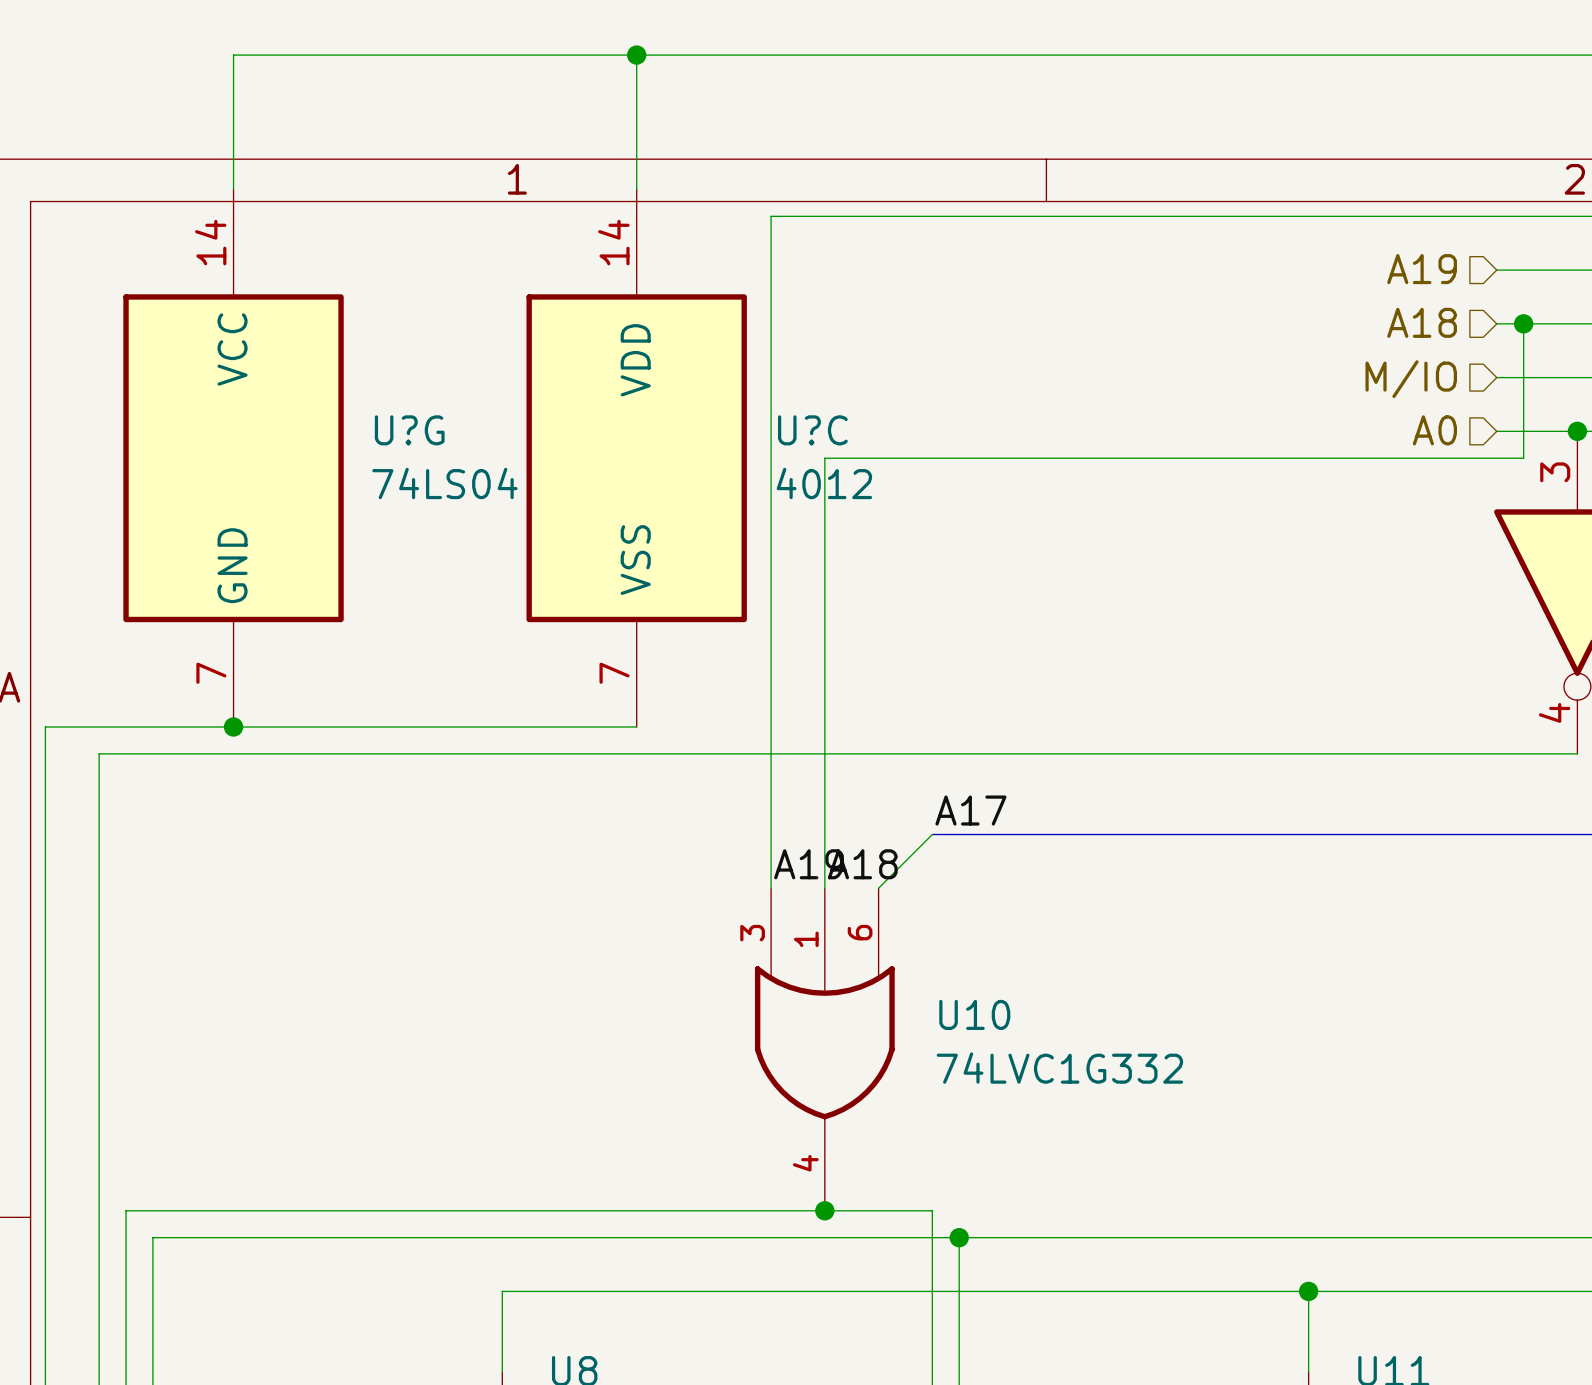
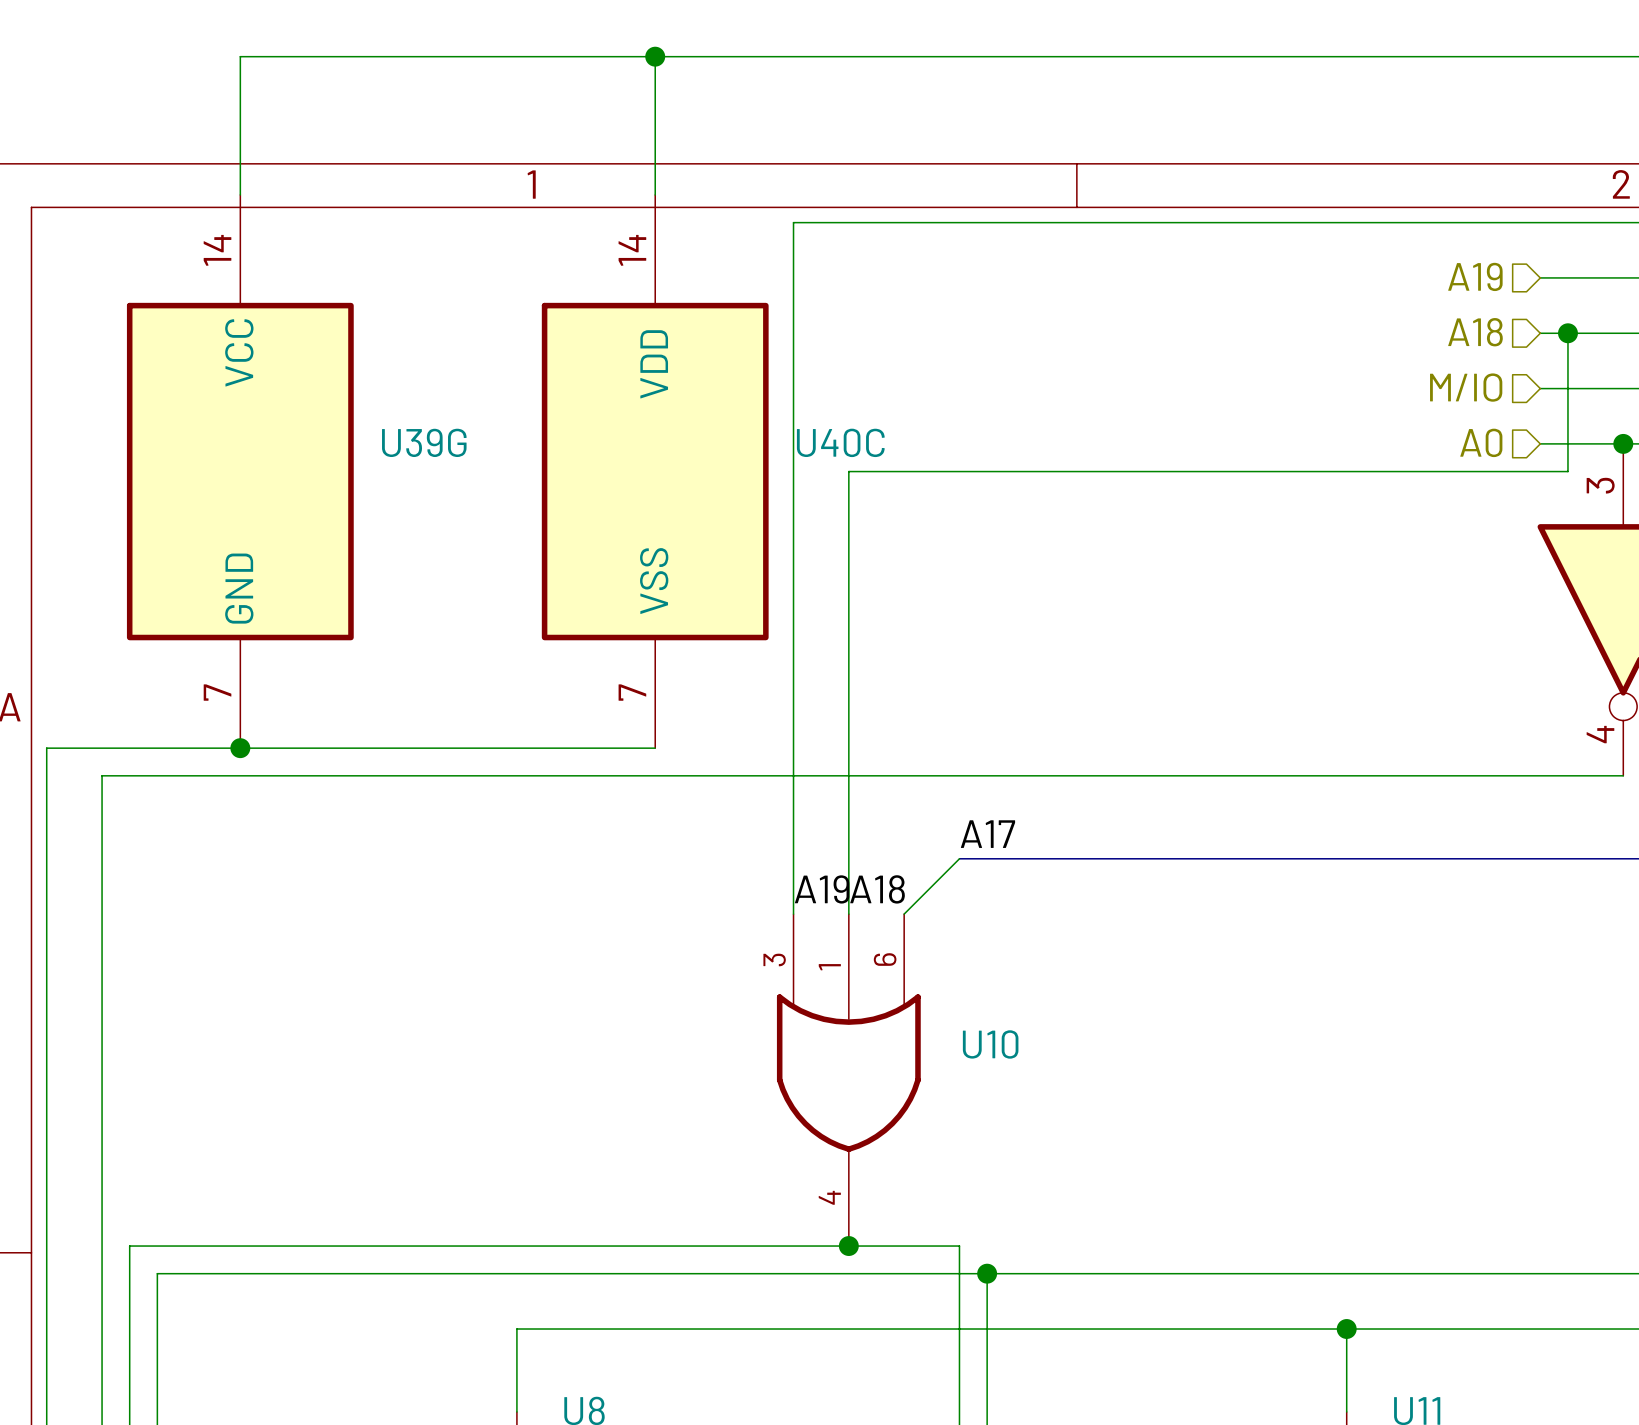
U?G name: U?G (409, 430) -> U39G (424, 442)
U?C name: U?C (812, 430) -> U40C (840, 442)
U?G value: 74LS04 (444, 483) -> none
U?C value: 4012 (824, 483) -> none
U10 value: 74LVC1G332 (1059, 1068) -> none

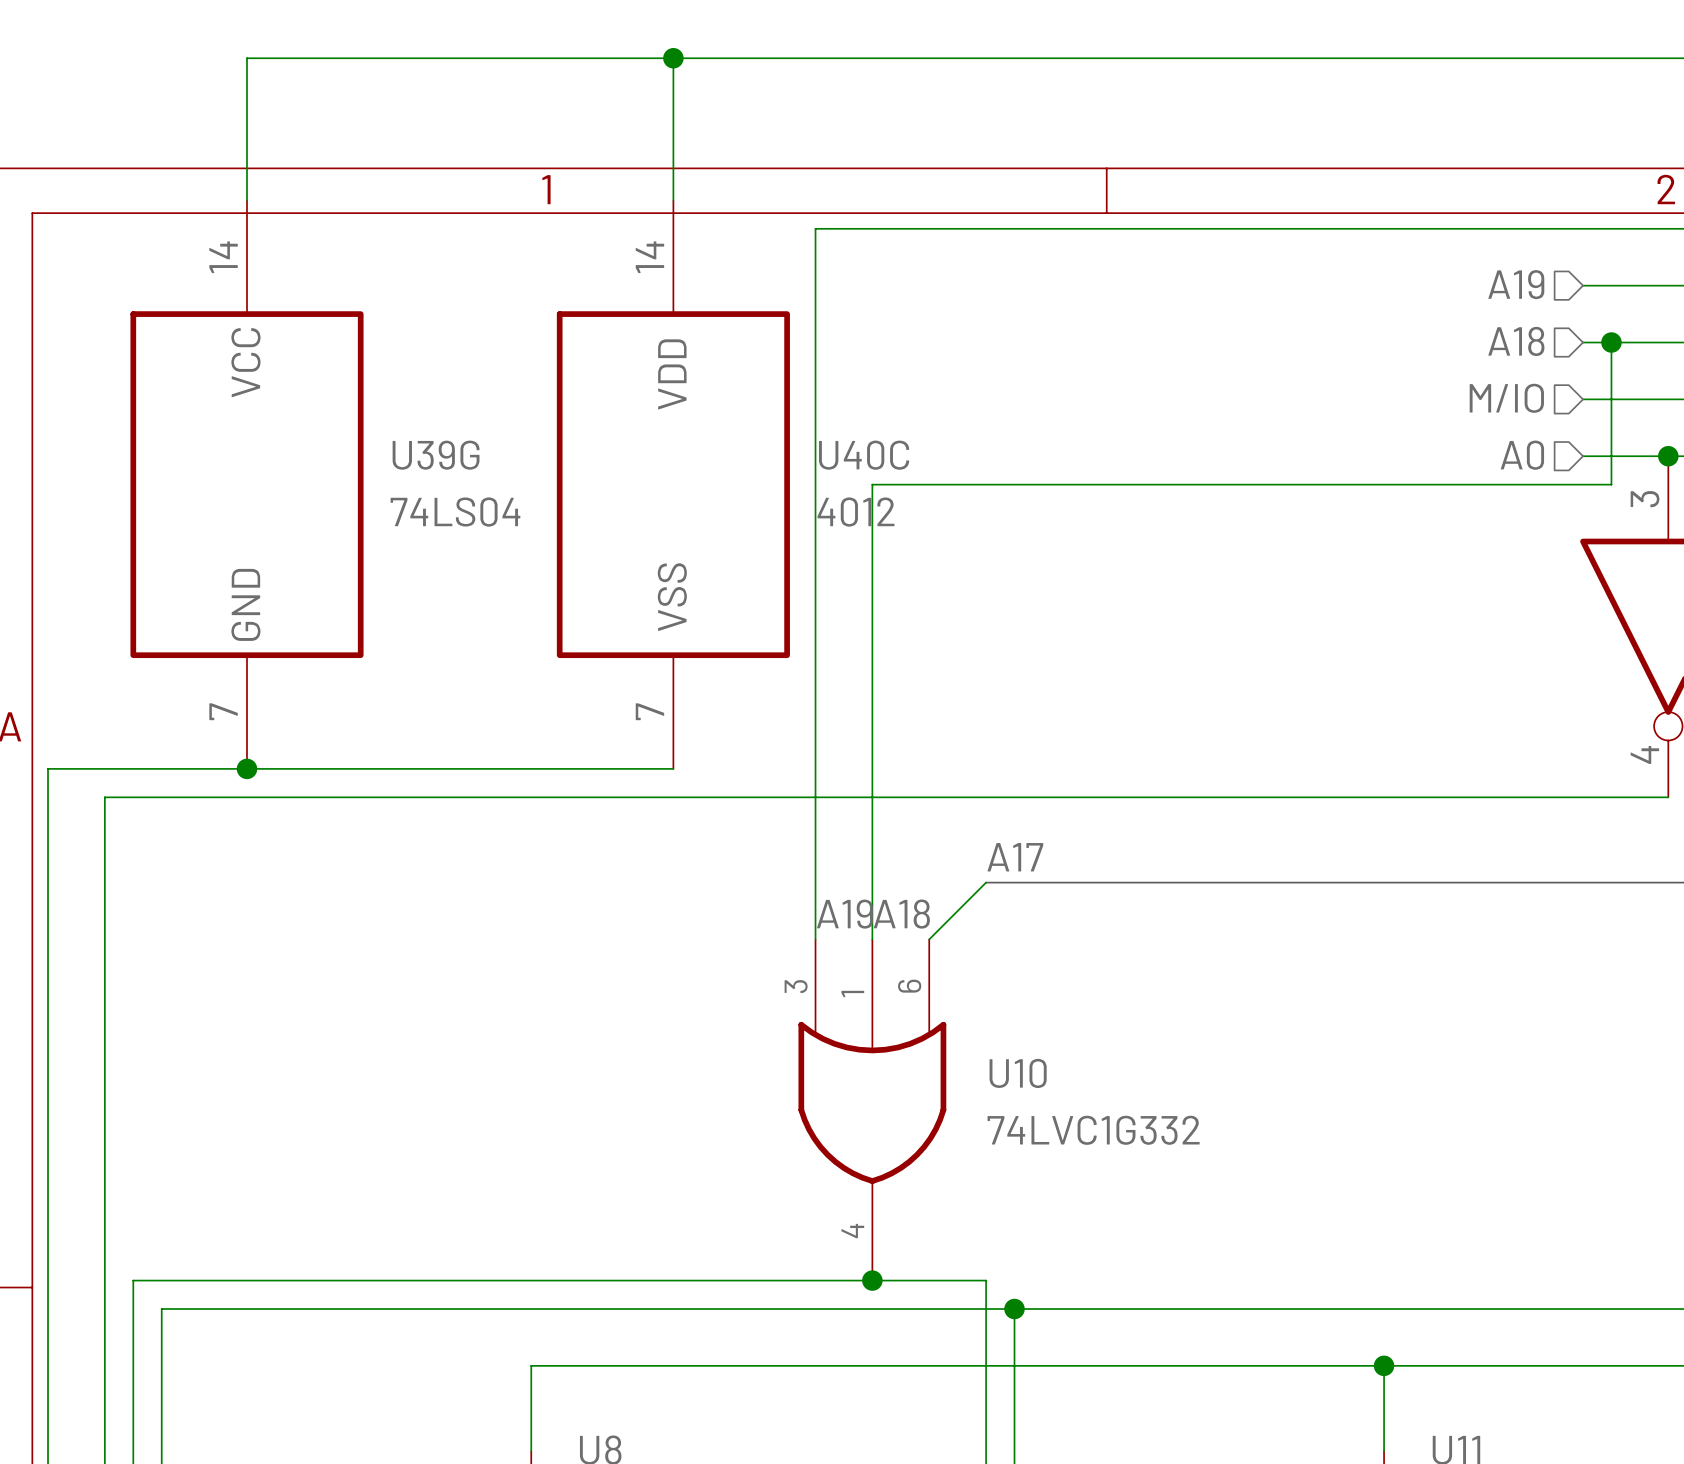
U39G value: none -> 74LS04 (455, 512)
U40C value: none -> 4012 (855, 512)
U10 value: none -> 74LVC1G332 (1093, 1130)

